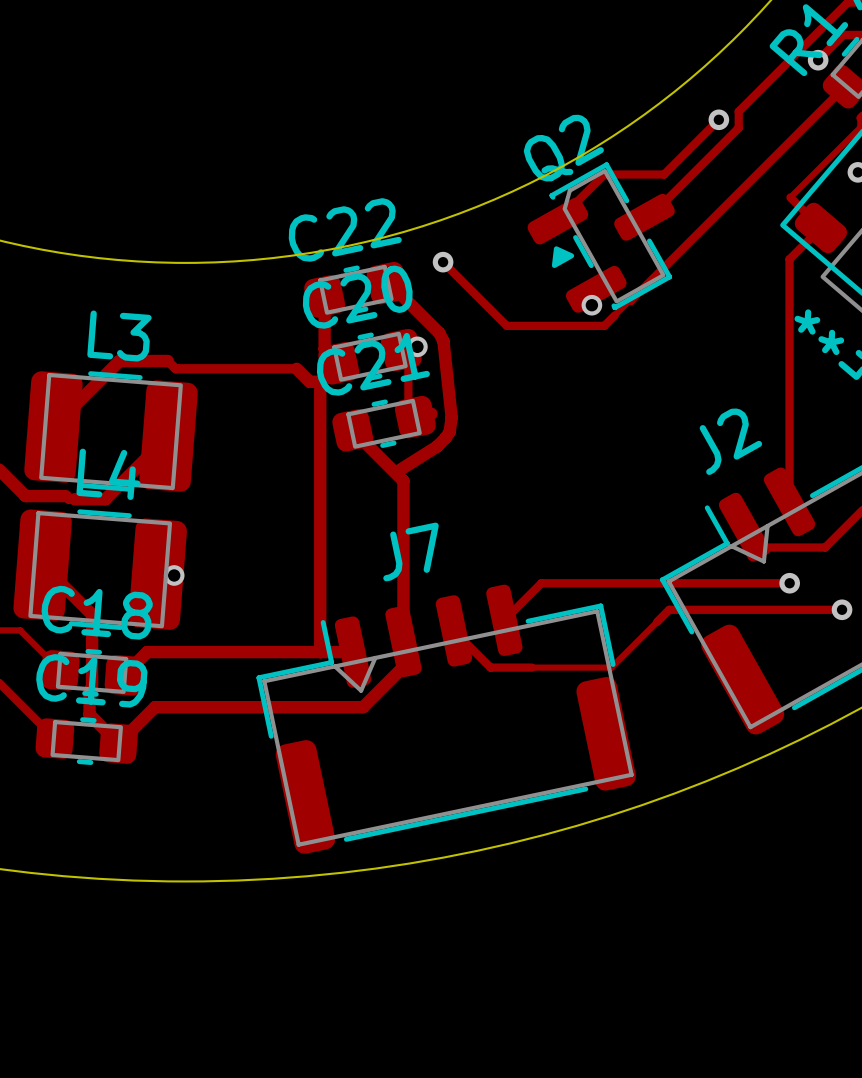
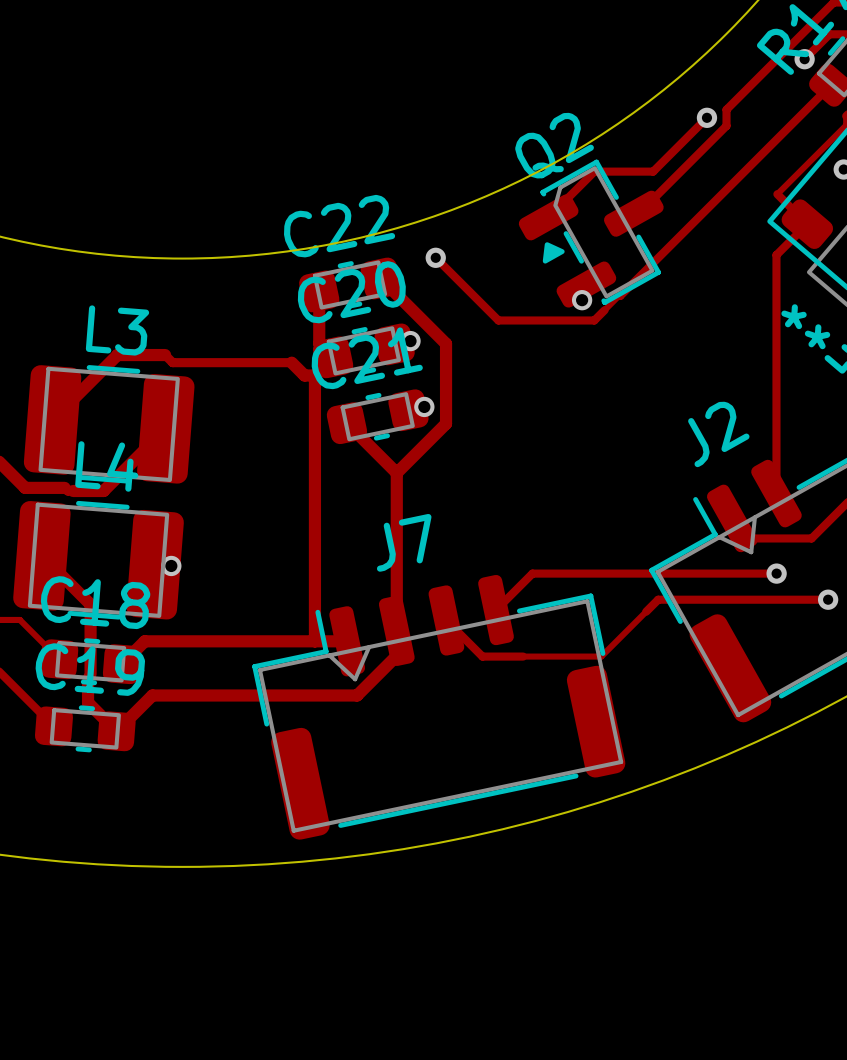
track: none -> (380, 278) (446, 343) (446, 423) (396, 473)
track: (404, 297) (439, 333) (443, 341) (451, 417) (449, 431) (445, 438) (437, 446) (398, 471) -> none
track: (408, 368) (408, 398) -> none
via: none -> (424, 406)

